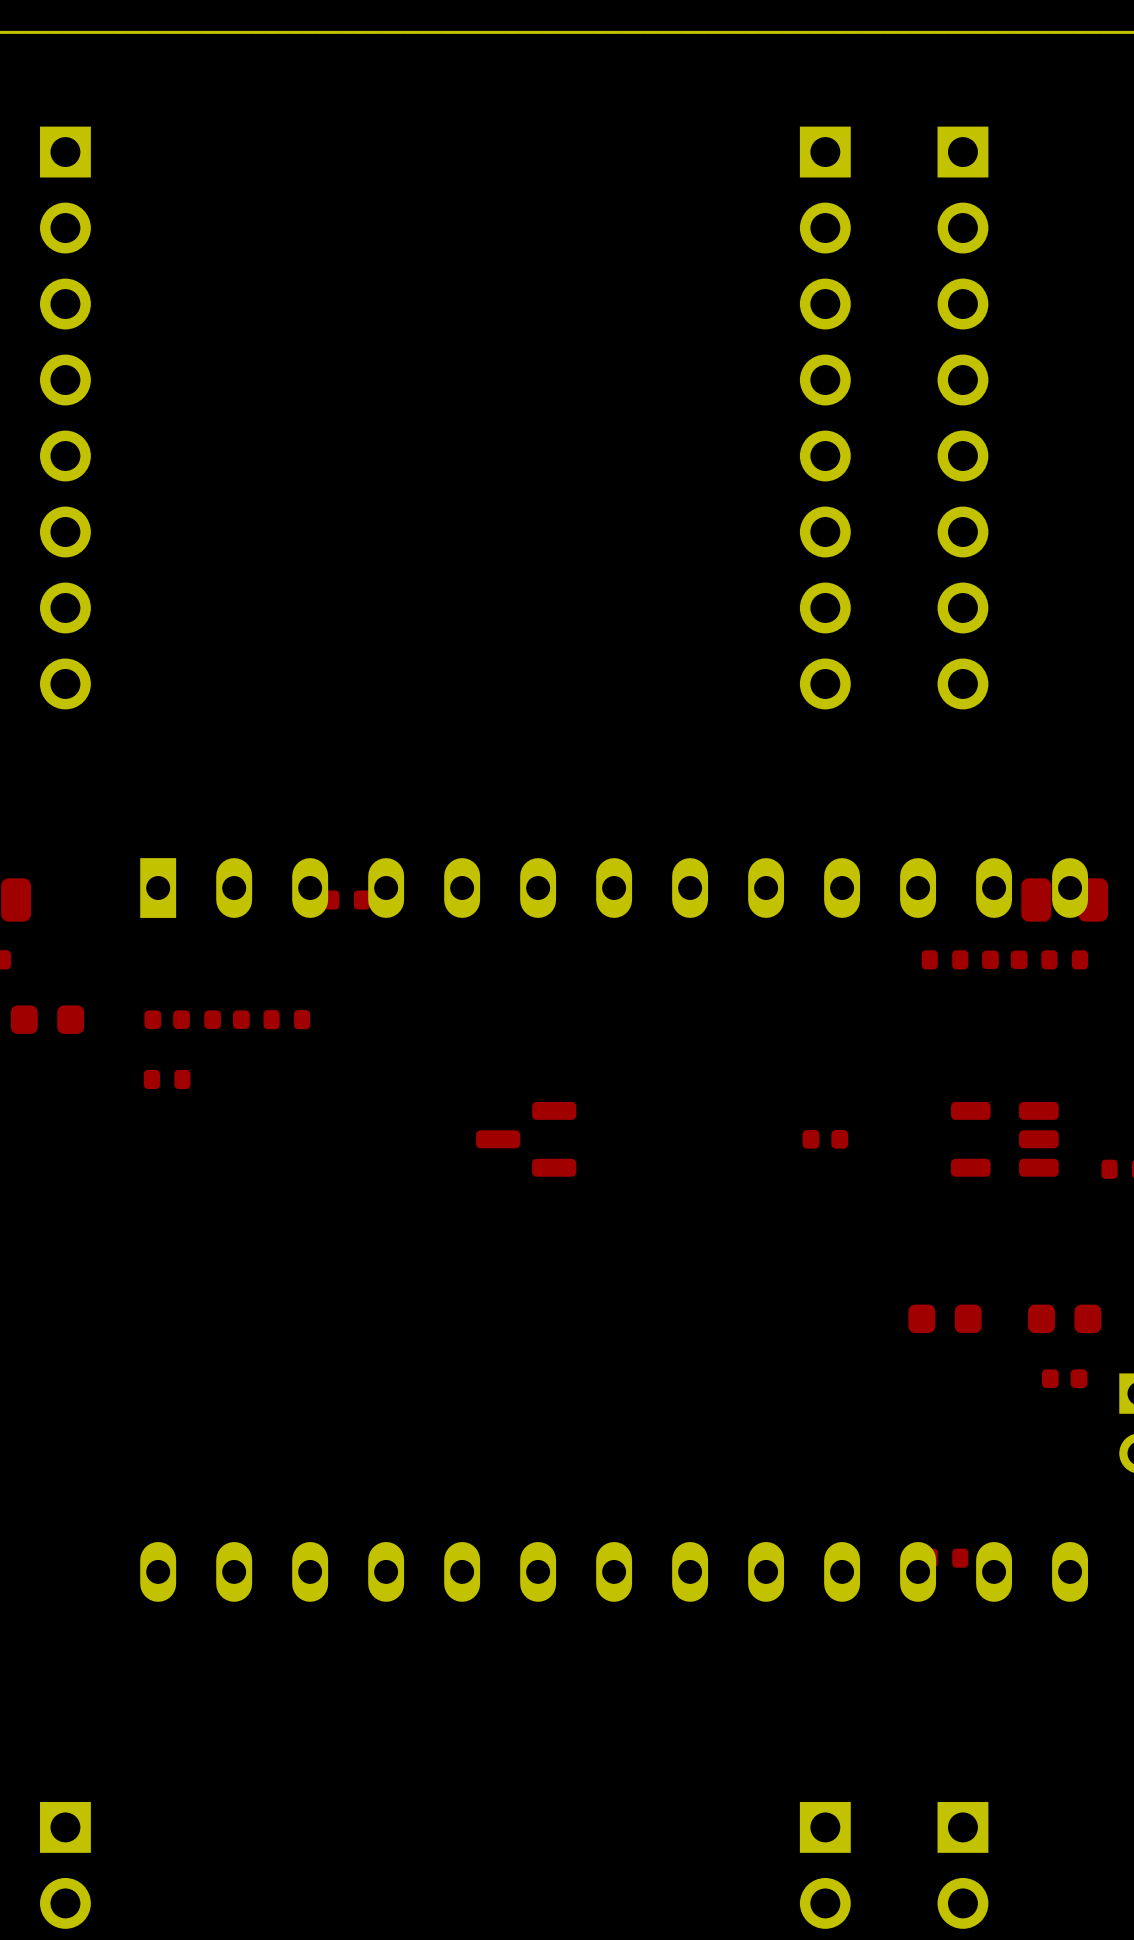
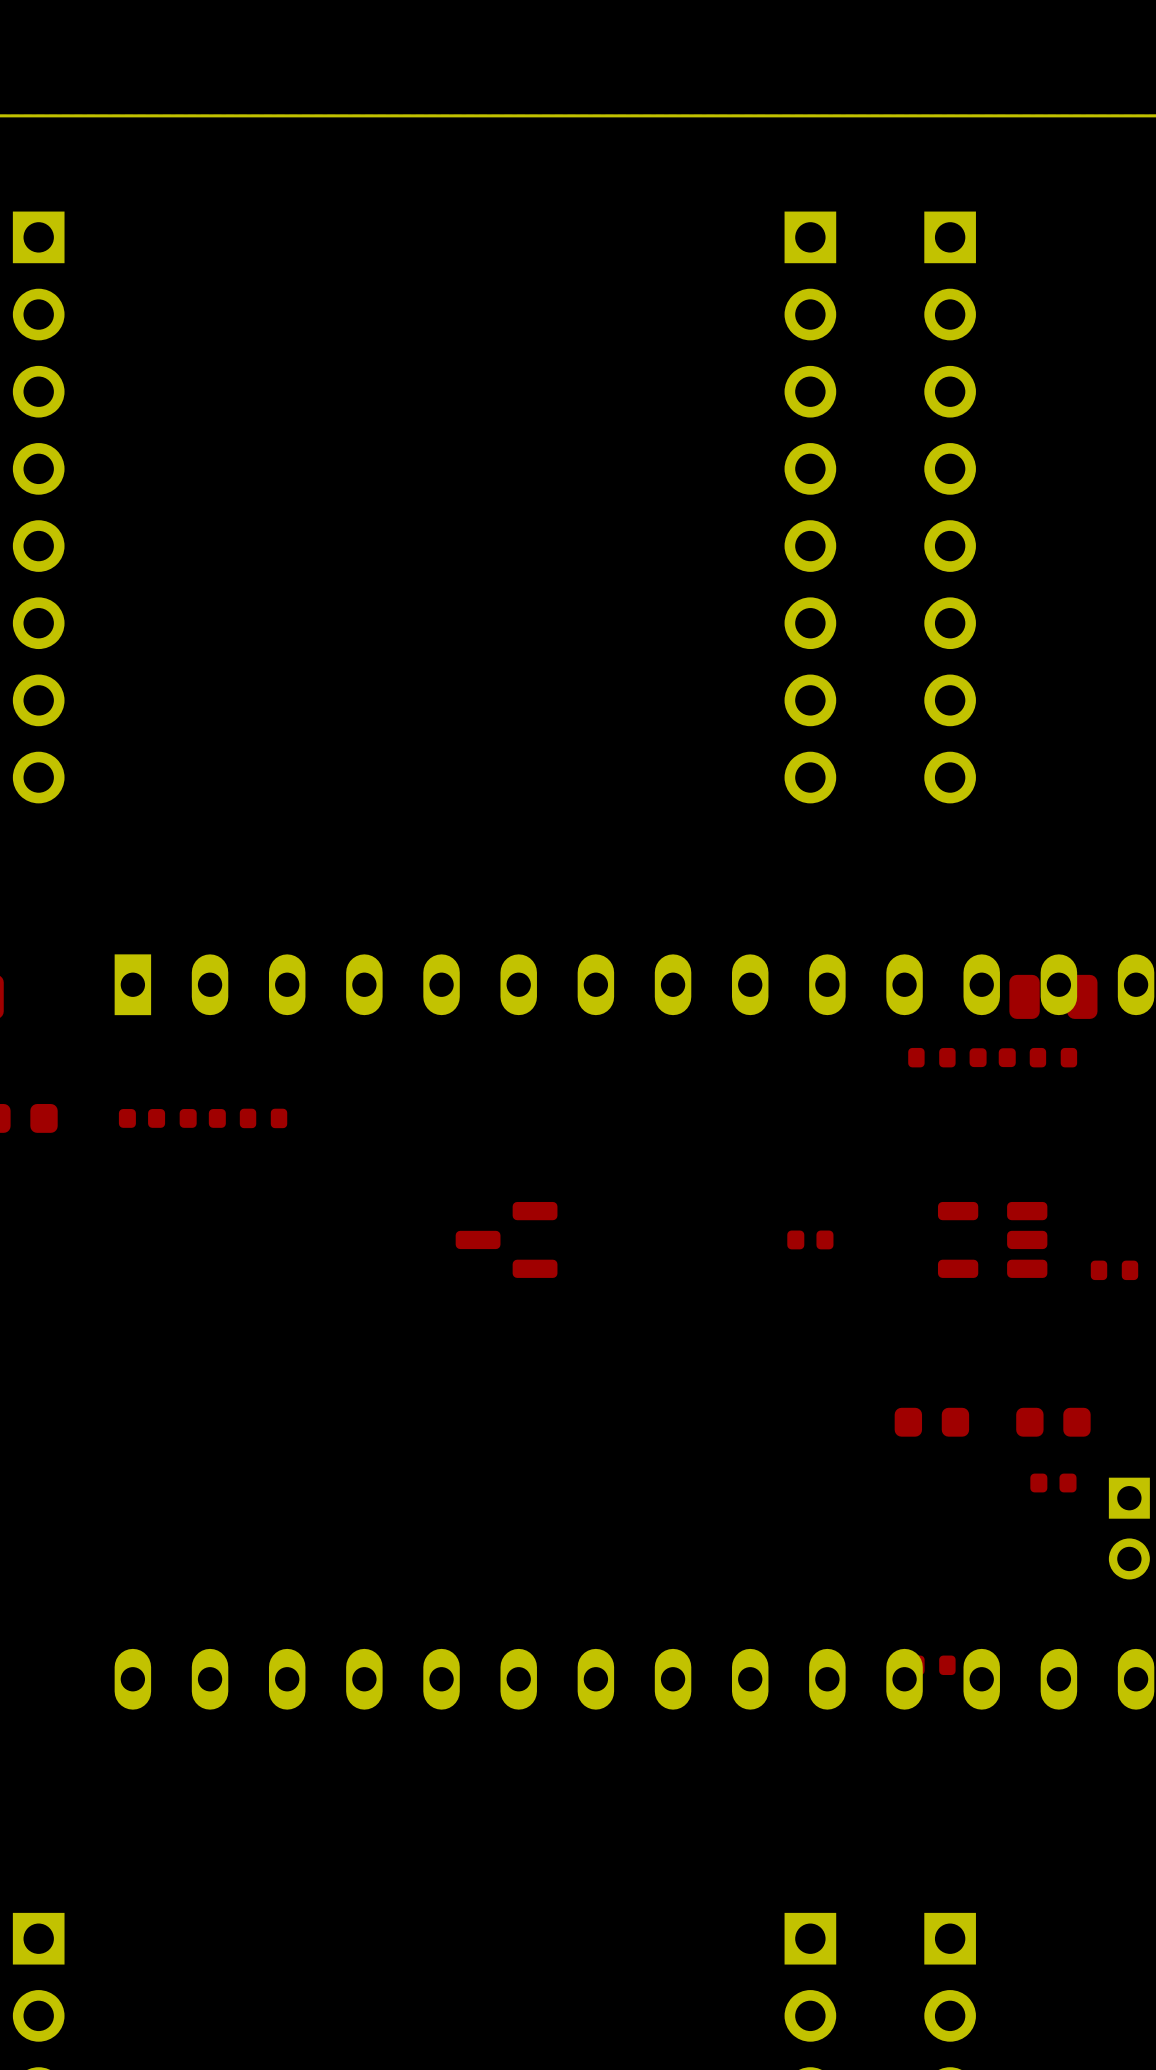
part: (346, 899) -> none
part: (167, 1079) -> none

